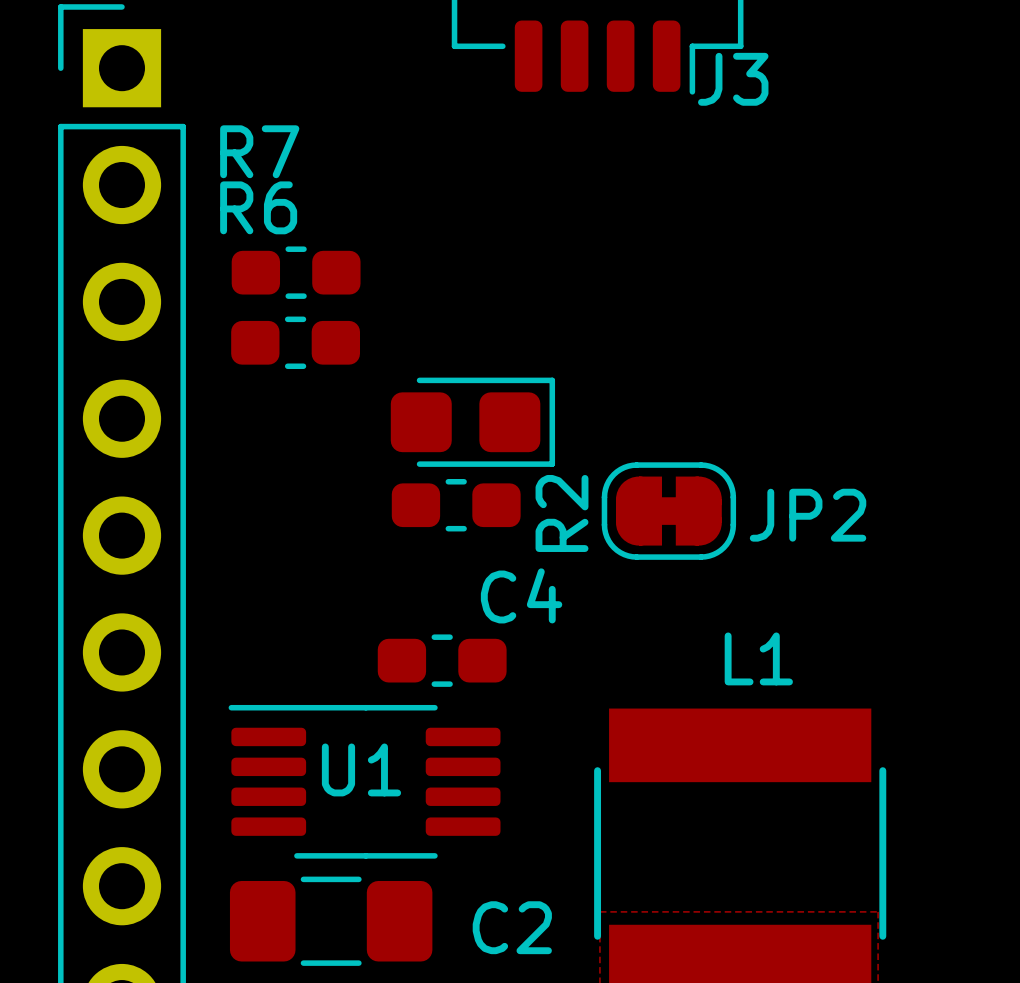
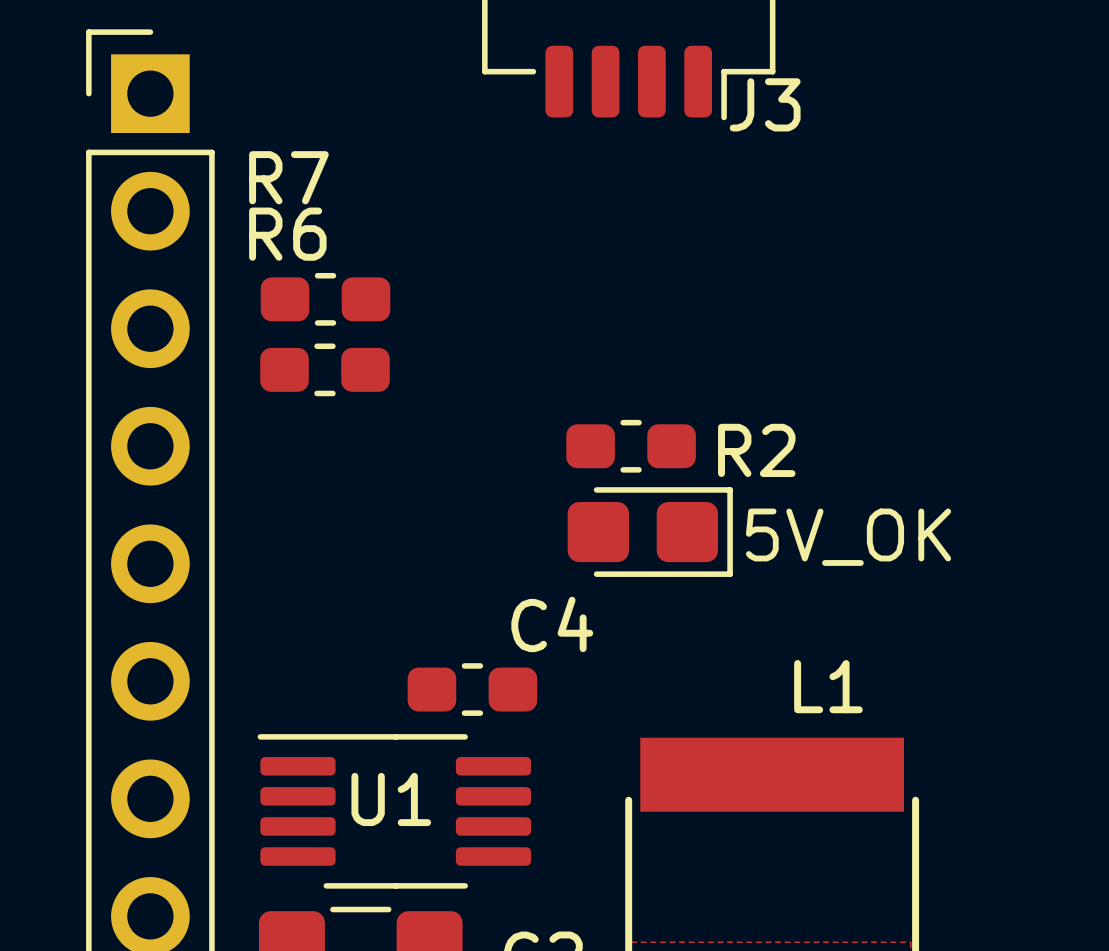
part: (472, 422) -> none
part: none -> 5V_OK (650, 532)
R2 position: (456, 505) -> (631, 446)
JP2: (668, 511) -> none
R2 name rotation: 0° (562, 513) -> 90° clockwise (756, 450)
L1 name position: L1 (758, 658) -> L1 (828, 686)

